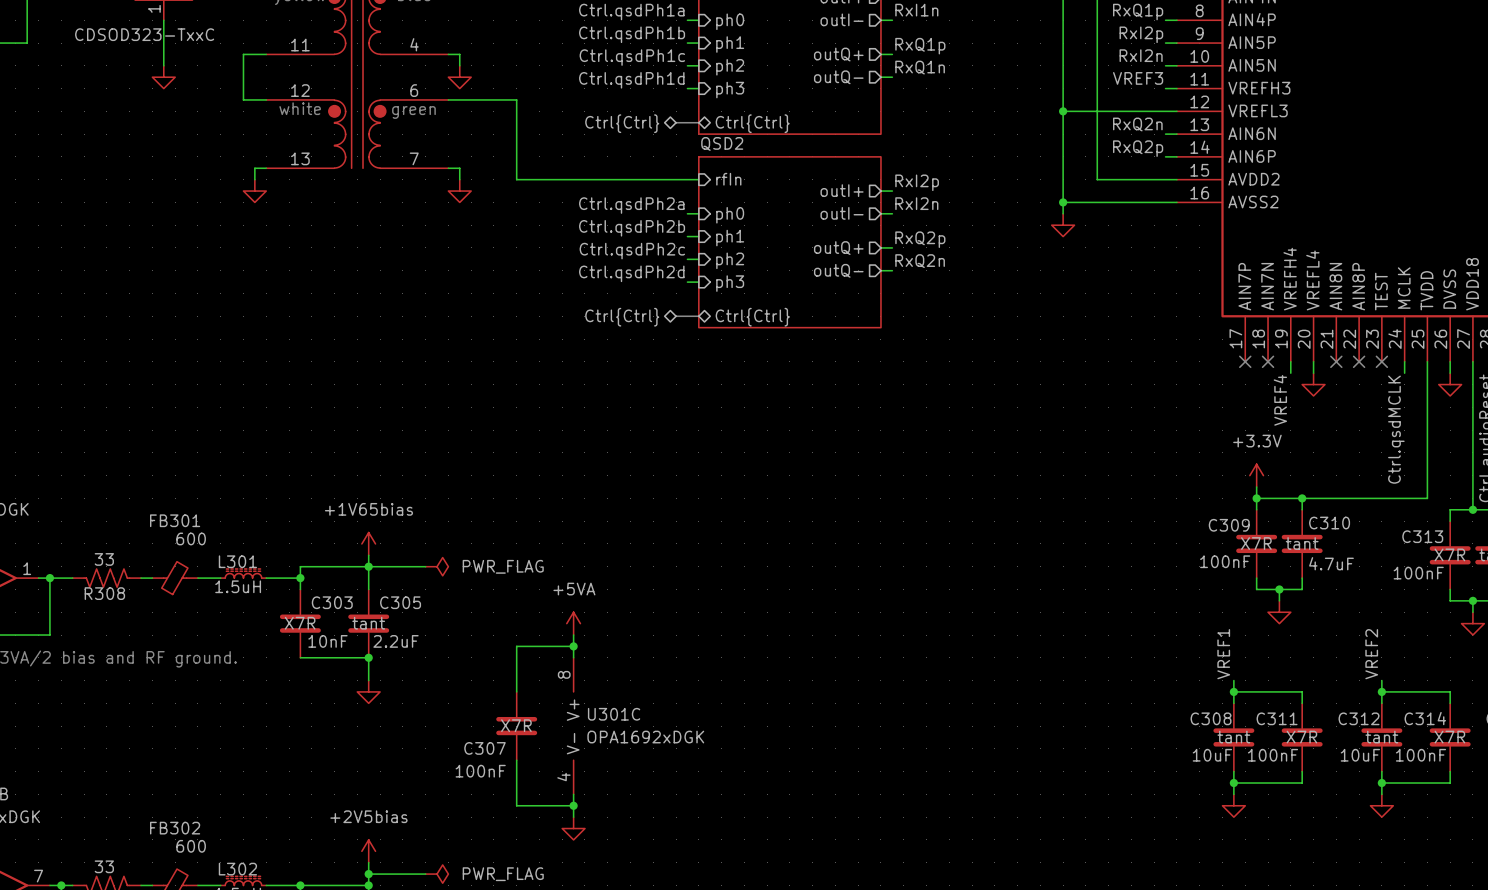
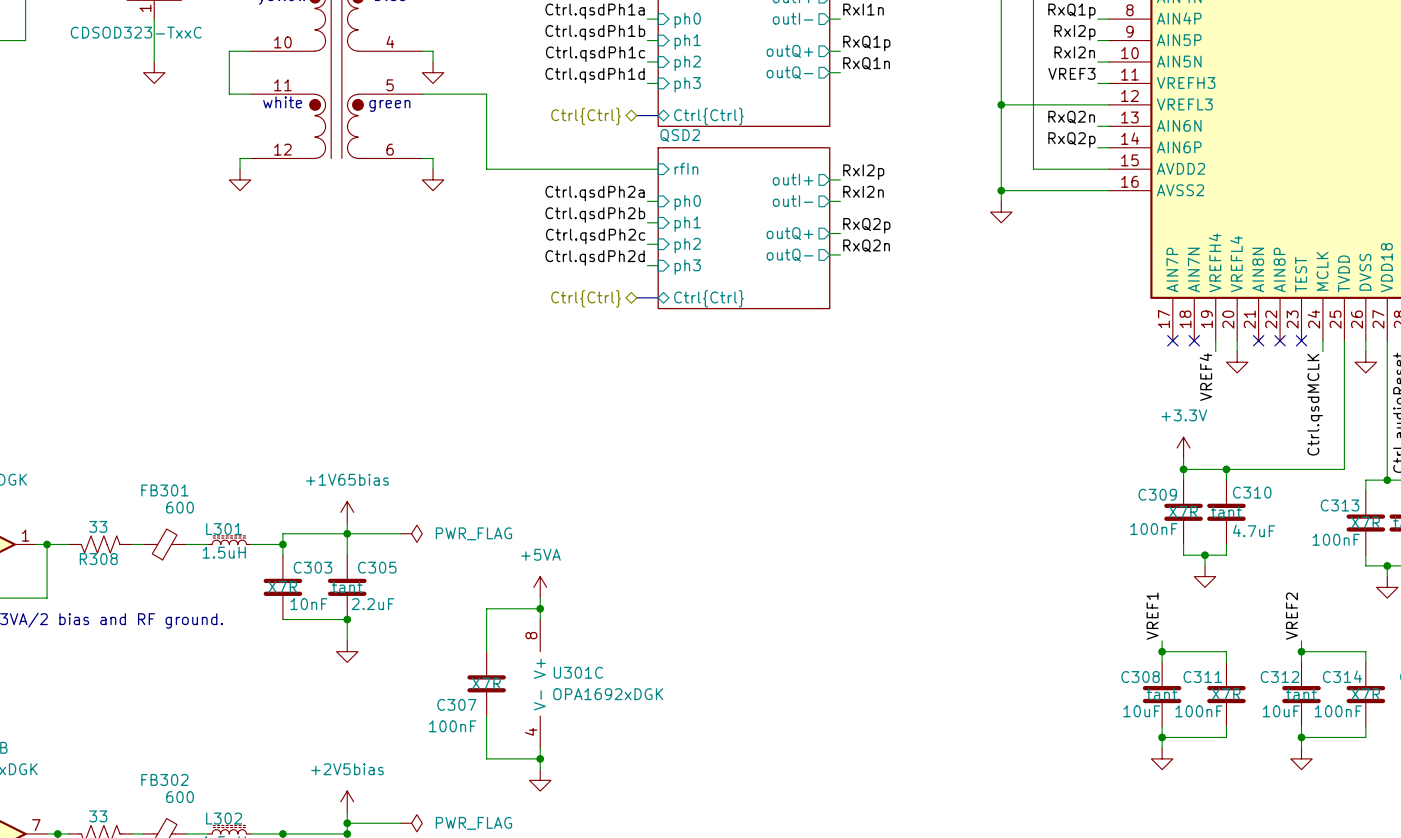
part pin number: 11 (300, 45) -> 10 (282, 42)
part pin number: 12 (300, 90) -> 11 (282, 85)
part pin number: 6 (414, 90) -> 5 (390, 85)
part pin number: 13 (300, 158) -> 12 (282, 149)
part pin number: 7 (414, 158) -> 6 (390, 149)

